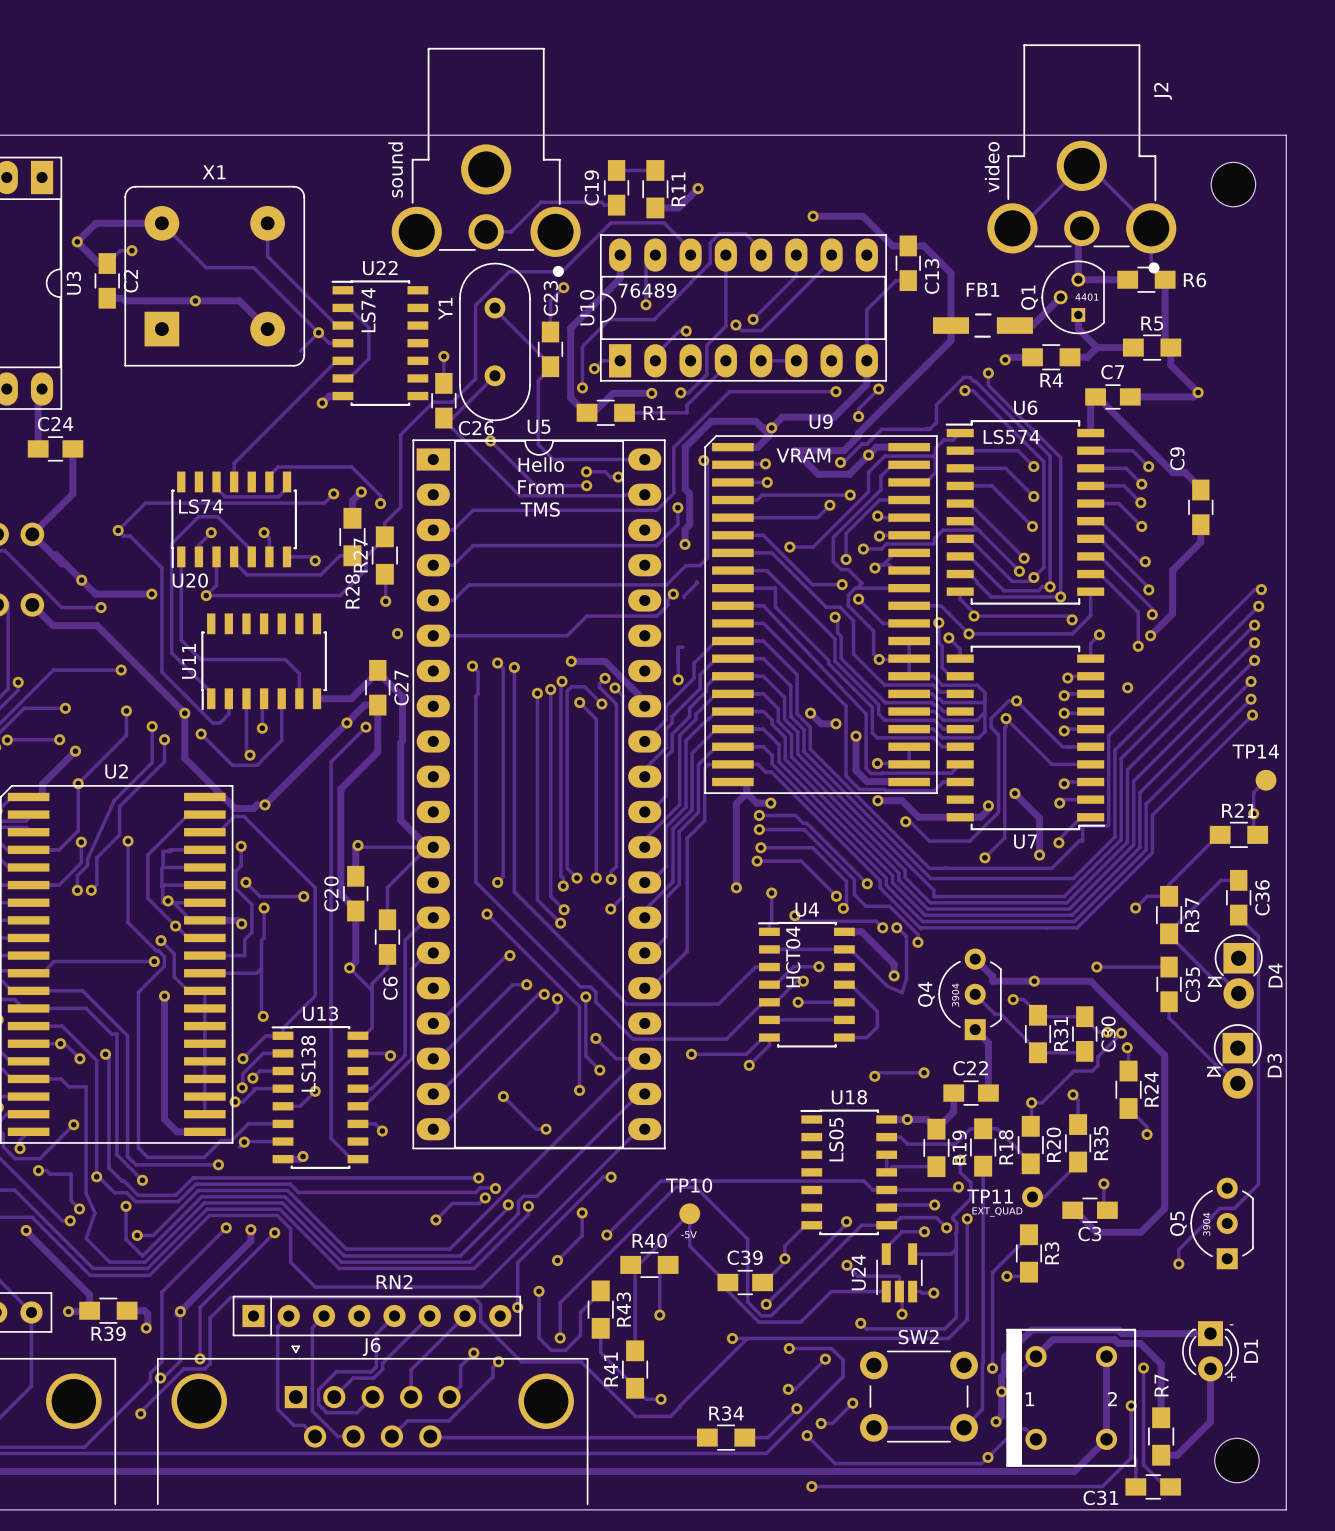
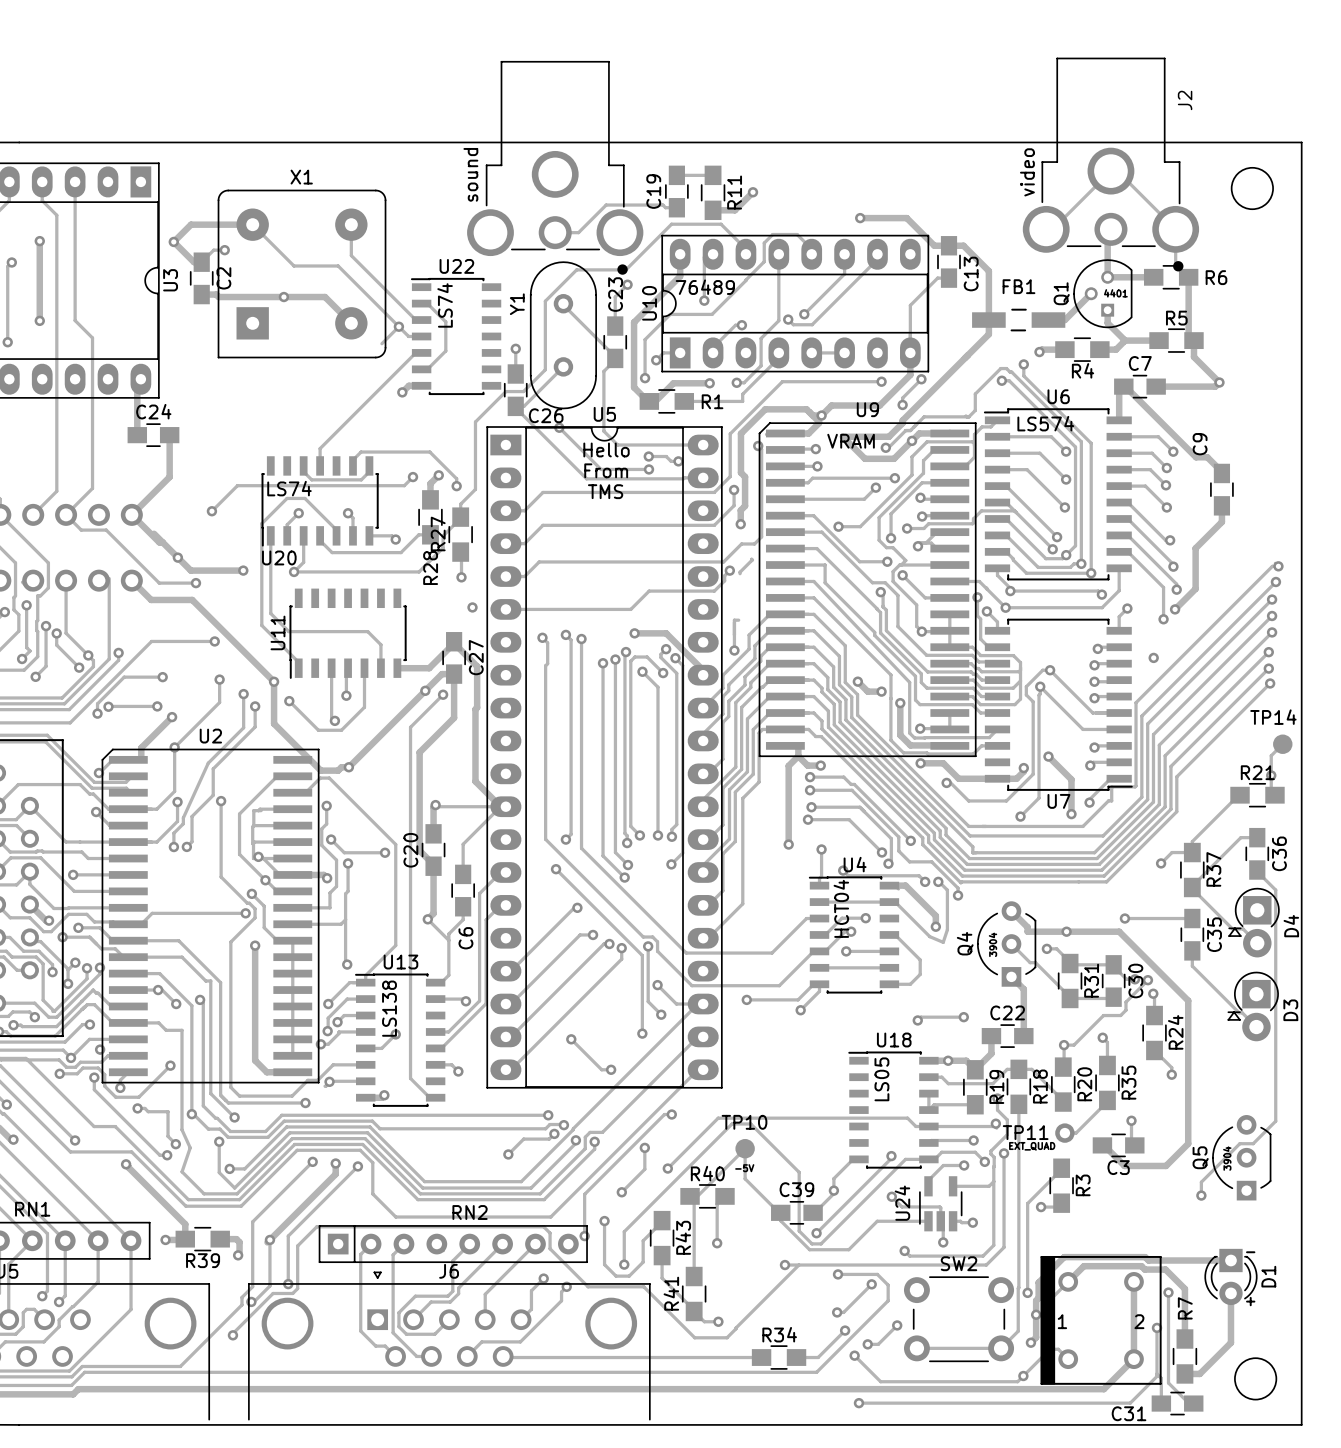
track: (118, 530) (123, 536) (130, 536) (161, 567) (161, 672) (212, 722) (220, 722) (228, 714) (228, 698) -> none

